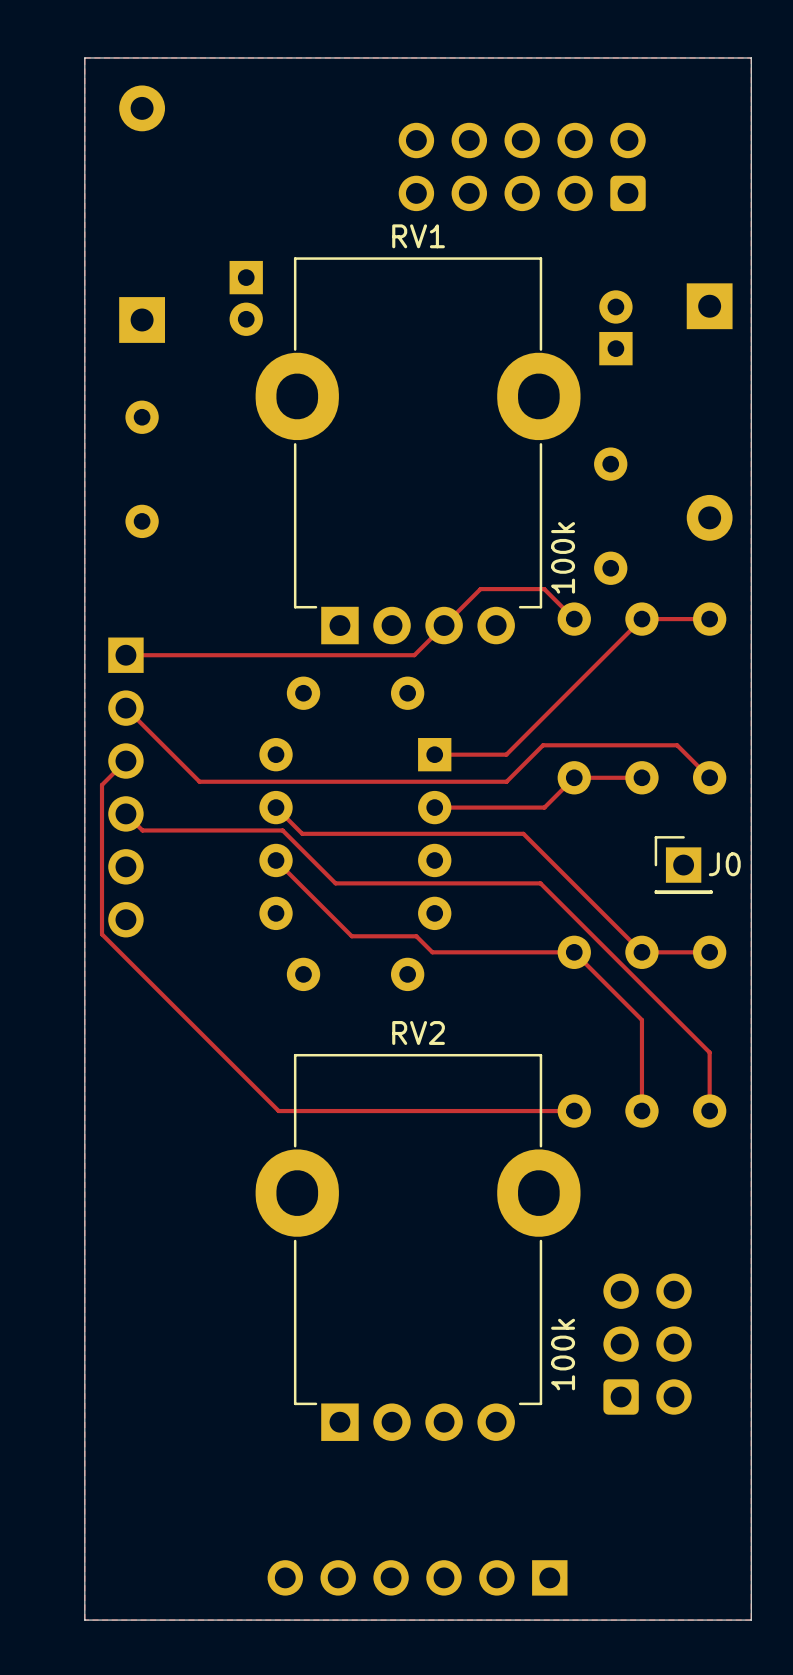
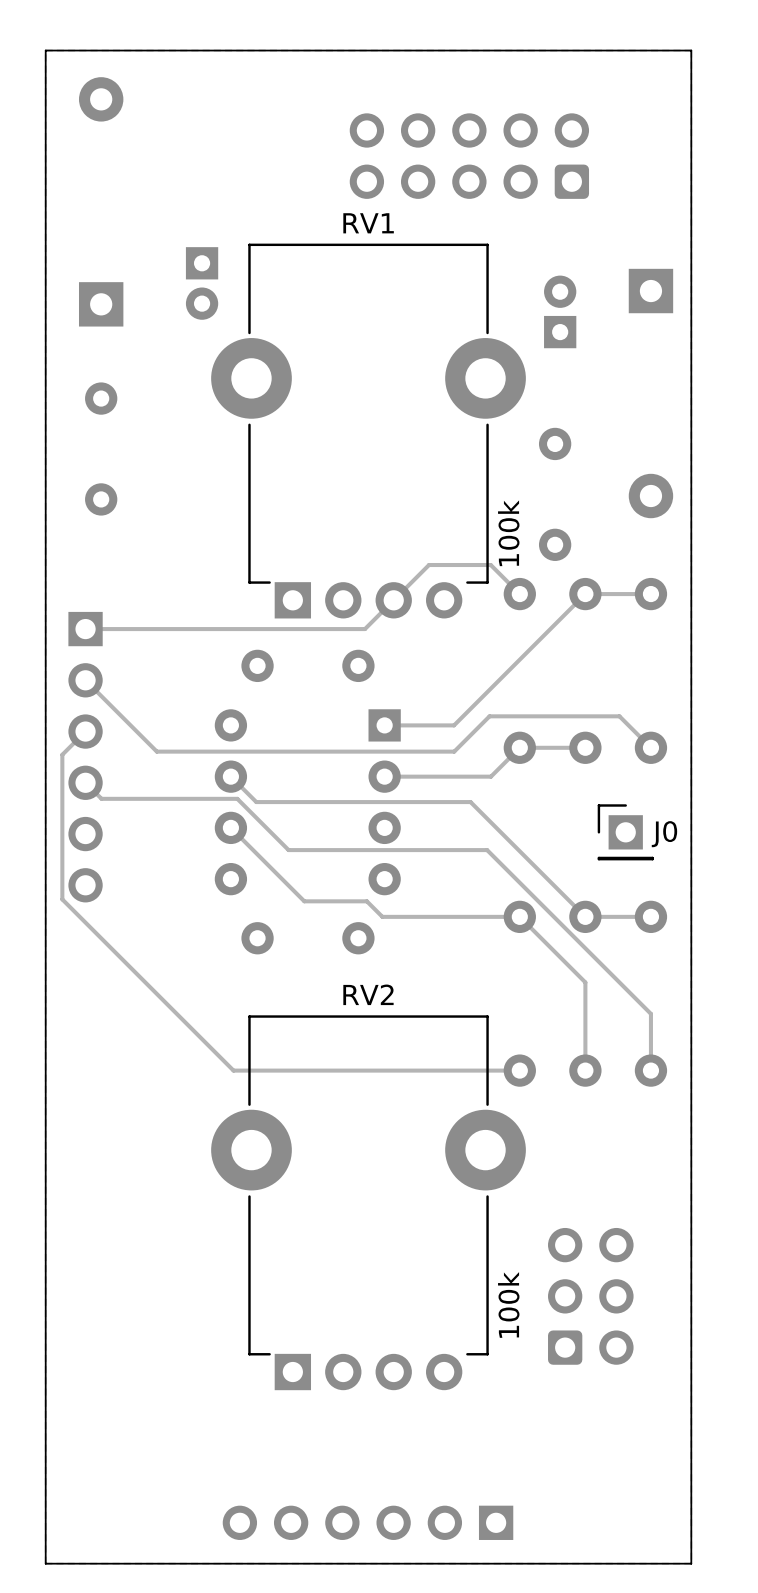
RV1 footprint: [255, 257, 581, 645] -> [211, 243, 526, 619]
RV2 footprint: [255, 1053, 581, 1441] -> [211, 1015, 526, 1391]

